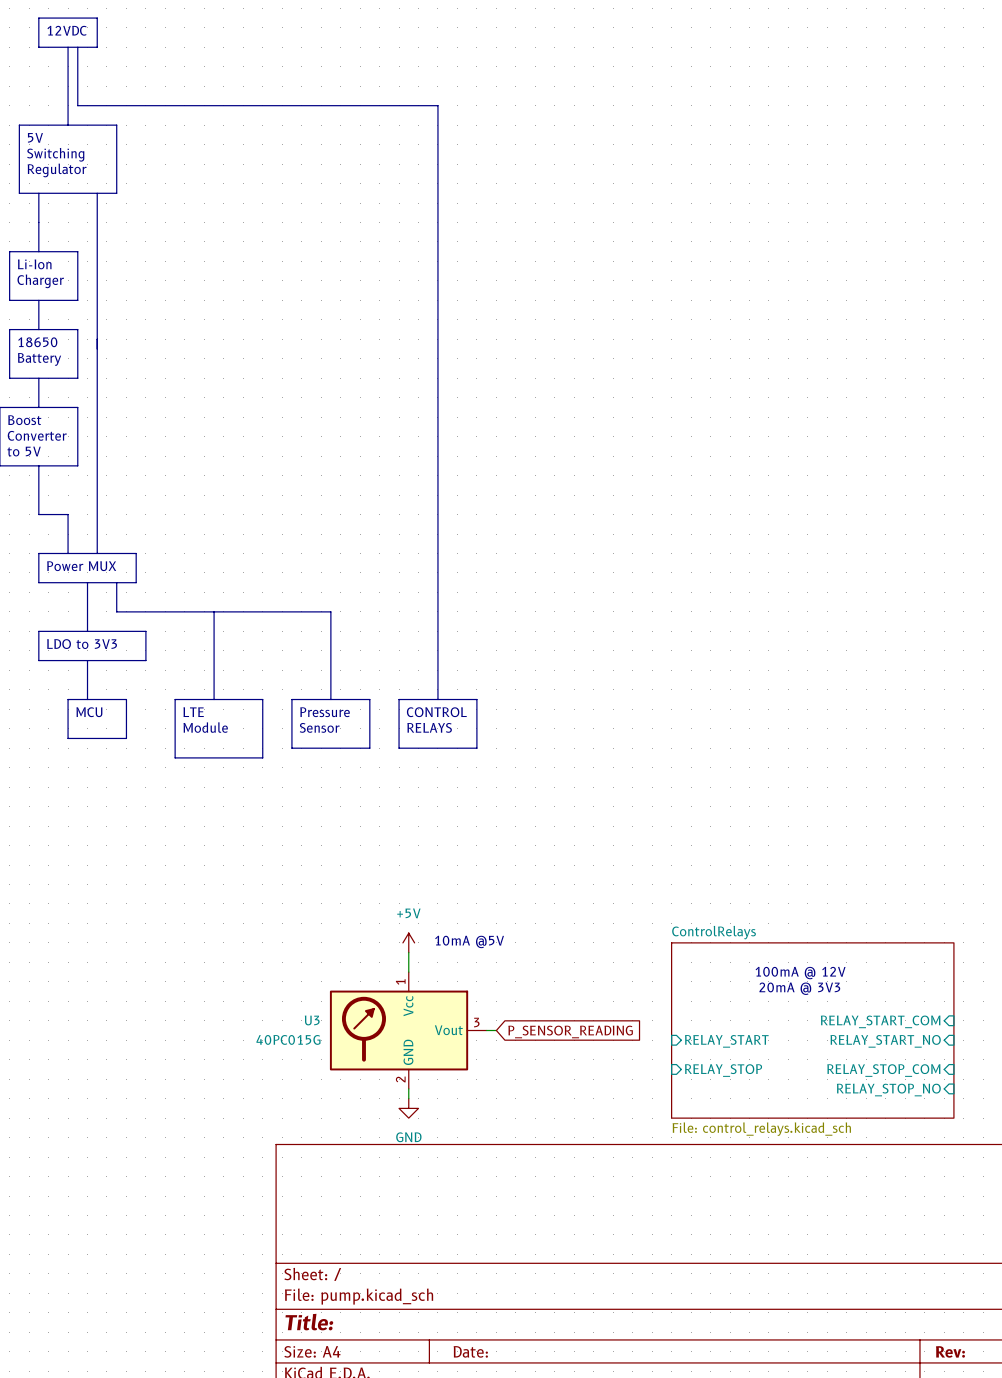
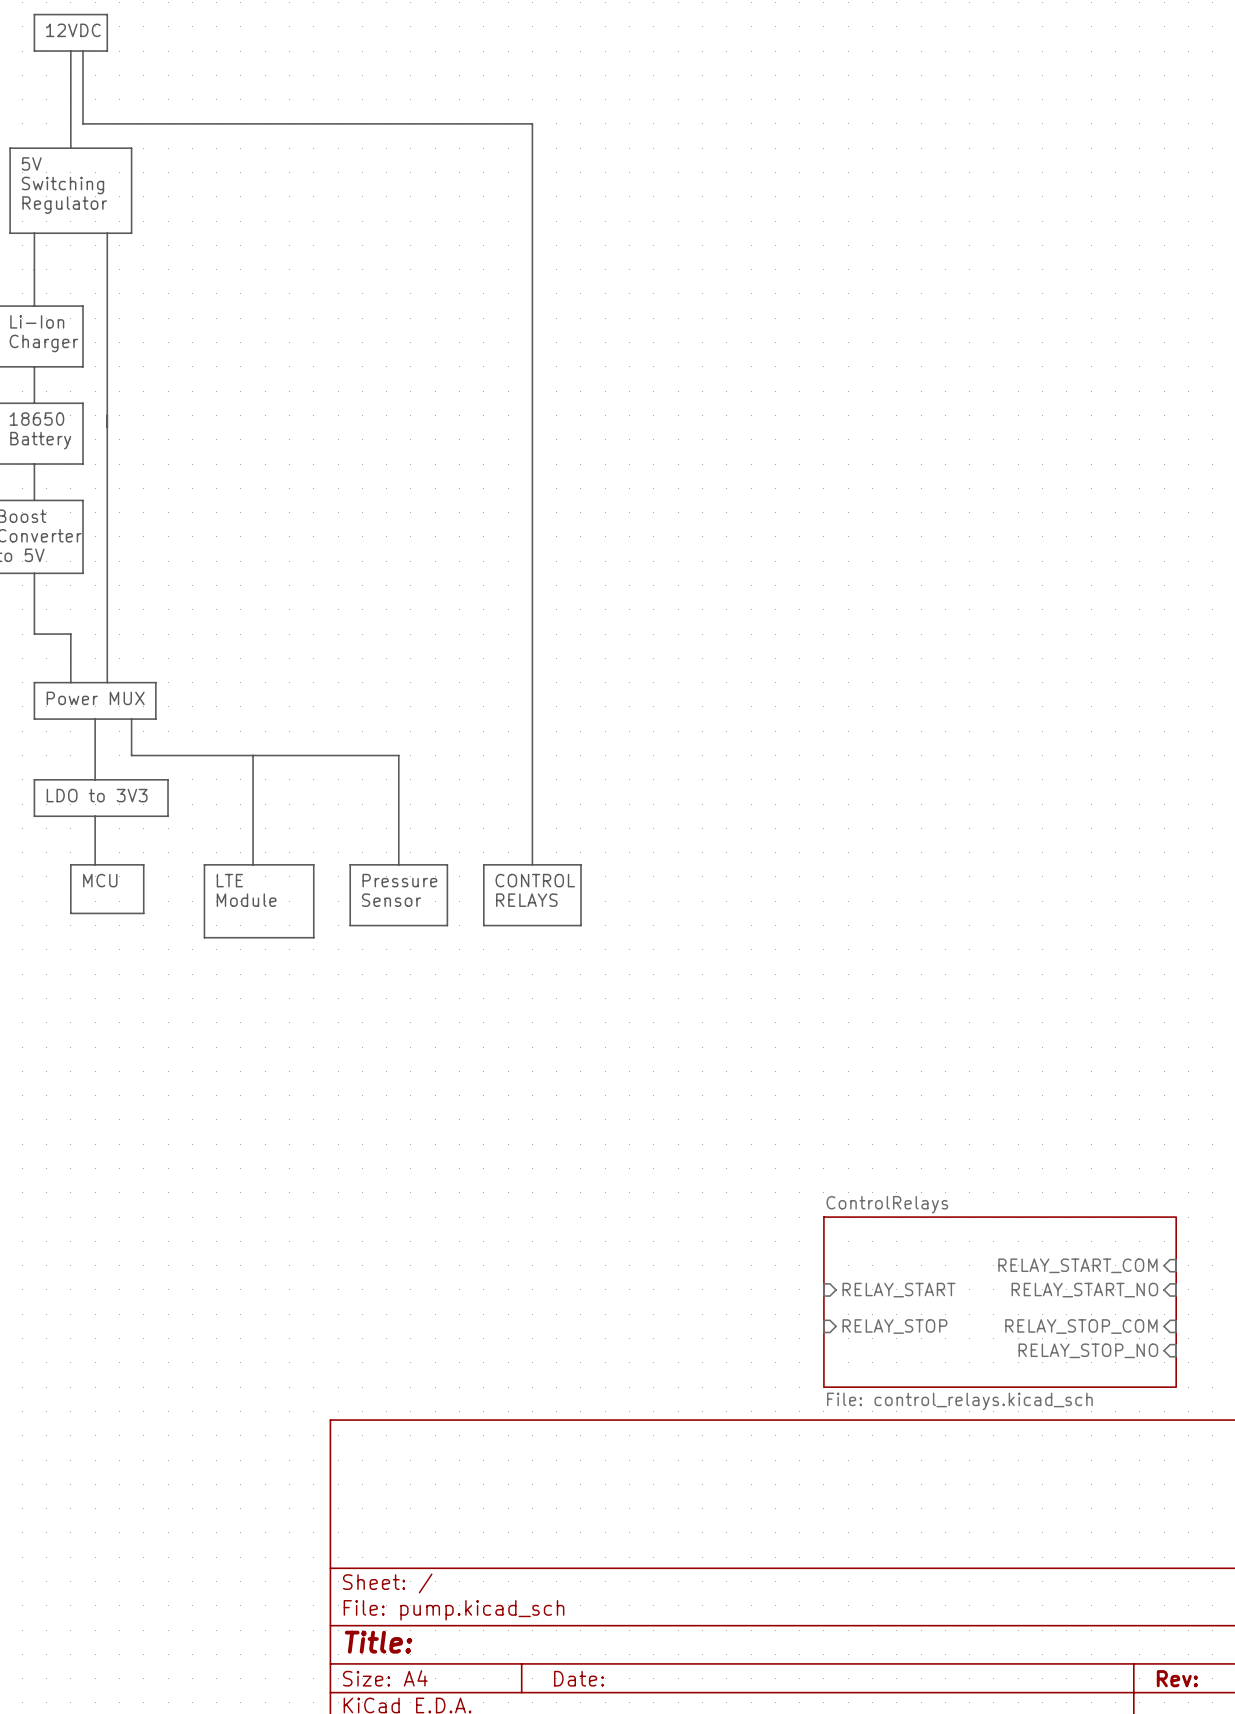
text: 10mA @5V (469, 941) -> none
power symbol: +5V (408, 942) -> none
wire: (408, 952) (408, 972) -> none
text: 100mA @ 12V (800, 973) -> none
text: 20mA @ 3V3 (799, 988) -> none
U3: 40PC015G (408, 1030) -> none
wire: (486, 1030) (496, 1030) -> none
sheet ControlRelays: File: control_relays.kicad_sch (812, 1030) -> none
global label: P_SENSOR_READING (570, 1031) -> none
sheet ControlRelays: none -> File: control_relays.kicad_sch (1000, 1302)
wire: (408, 1088) (408, 1098) -> none
power symbol: GND (408, 1108) -> none

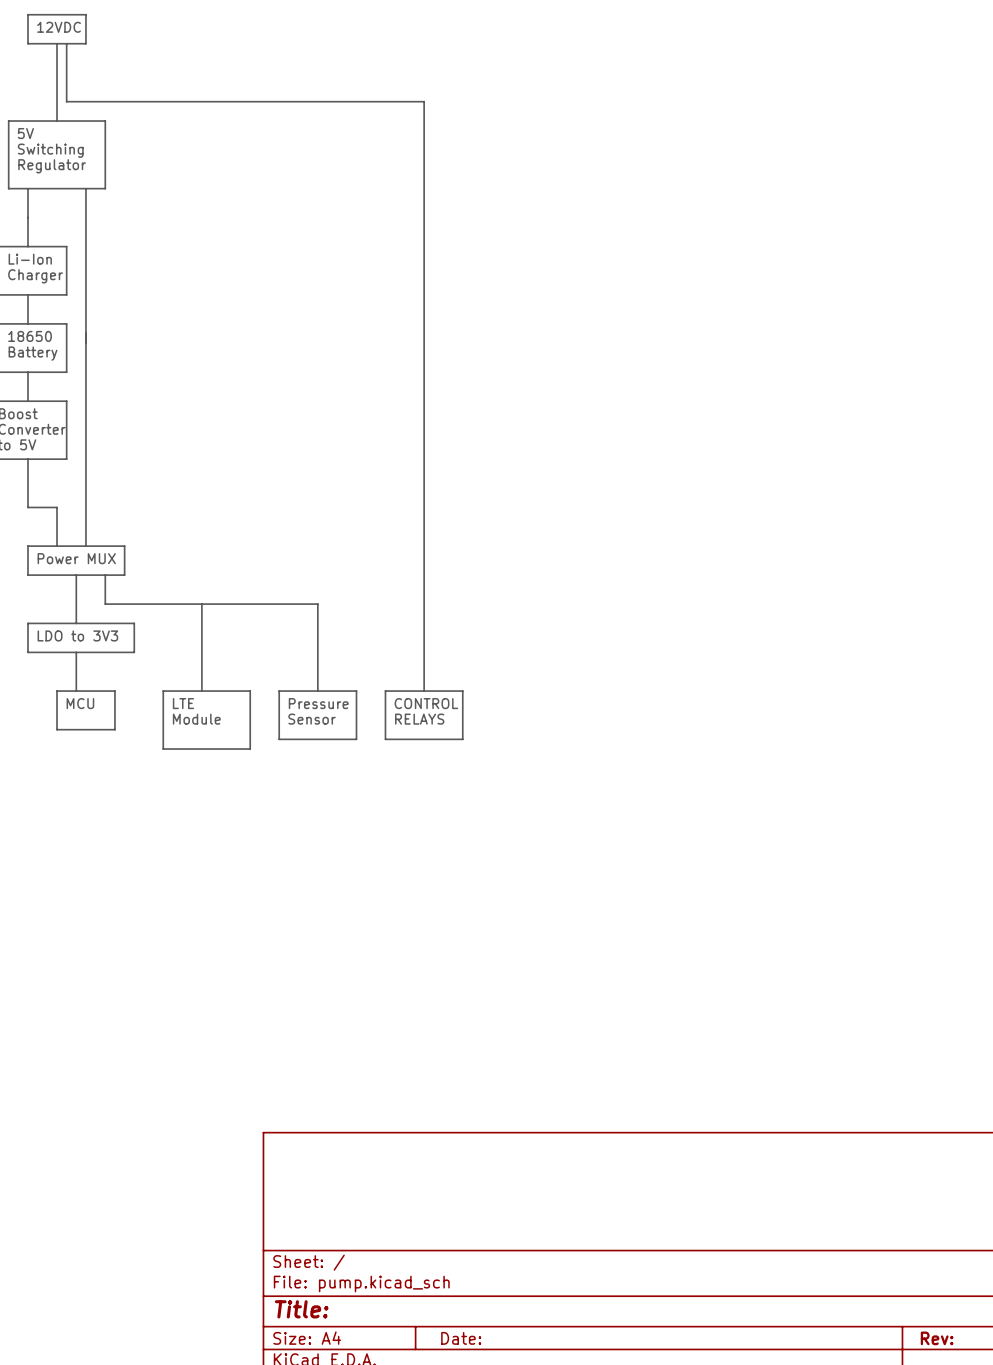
sheet pin: RELAY_START_COM (1077, 1265) -> none
sheet pin: RELAY_START (899, 1290) -> none
sheet pin: RELAY_START_NO (1084, 1290) -> none
sheet ControlRelays: File: control_relays.kicad_sch (1000, 1302) -> none
sheet pin: RELAY_STOP (894, 1326) -> none
sheet pin: RELAY_STOP_COM (1081, 1326) -> none
sheet pin: RELAY_STOP_NO (1088, 1350) -> none

